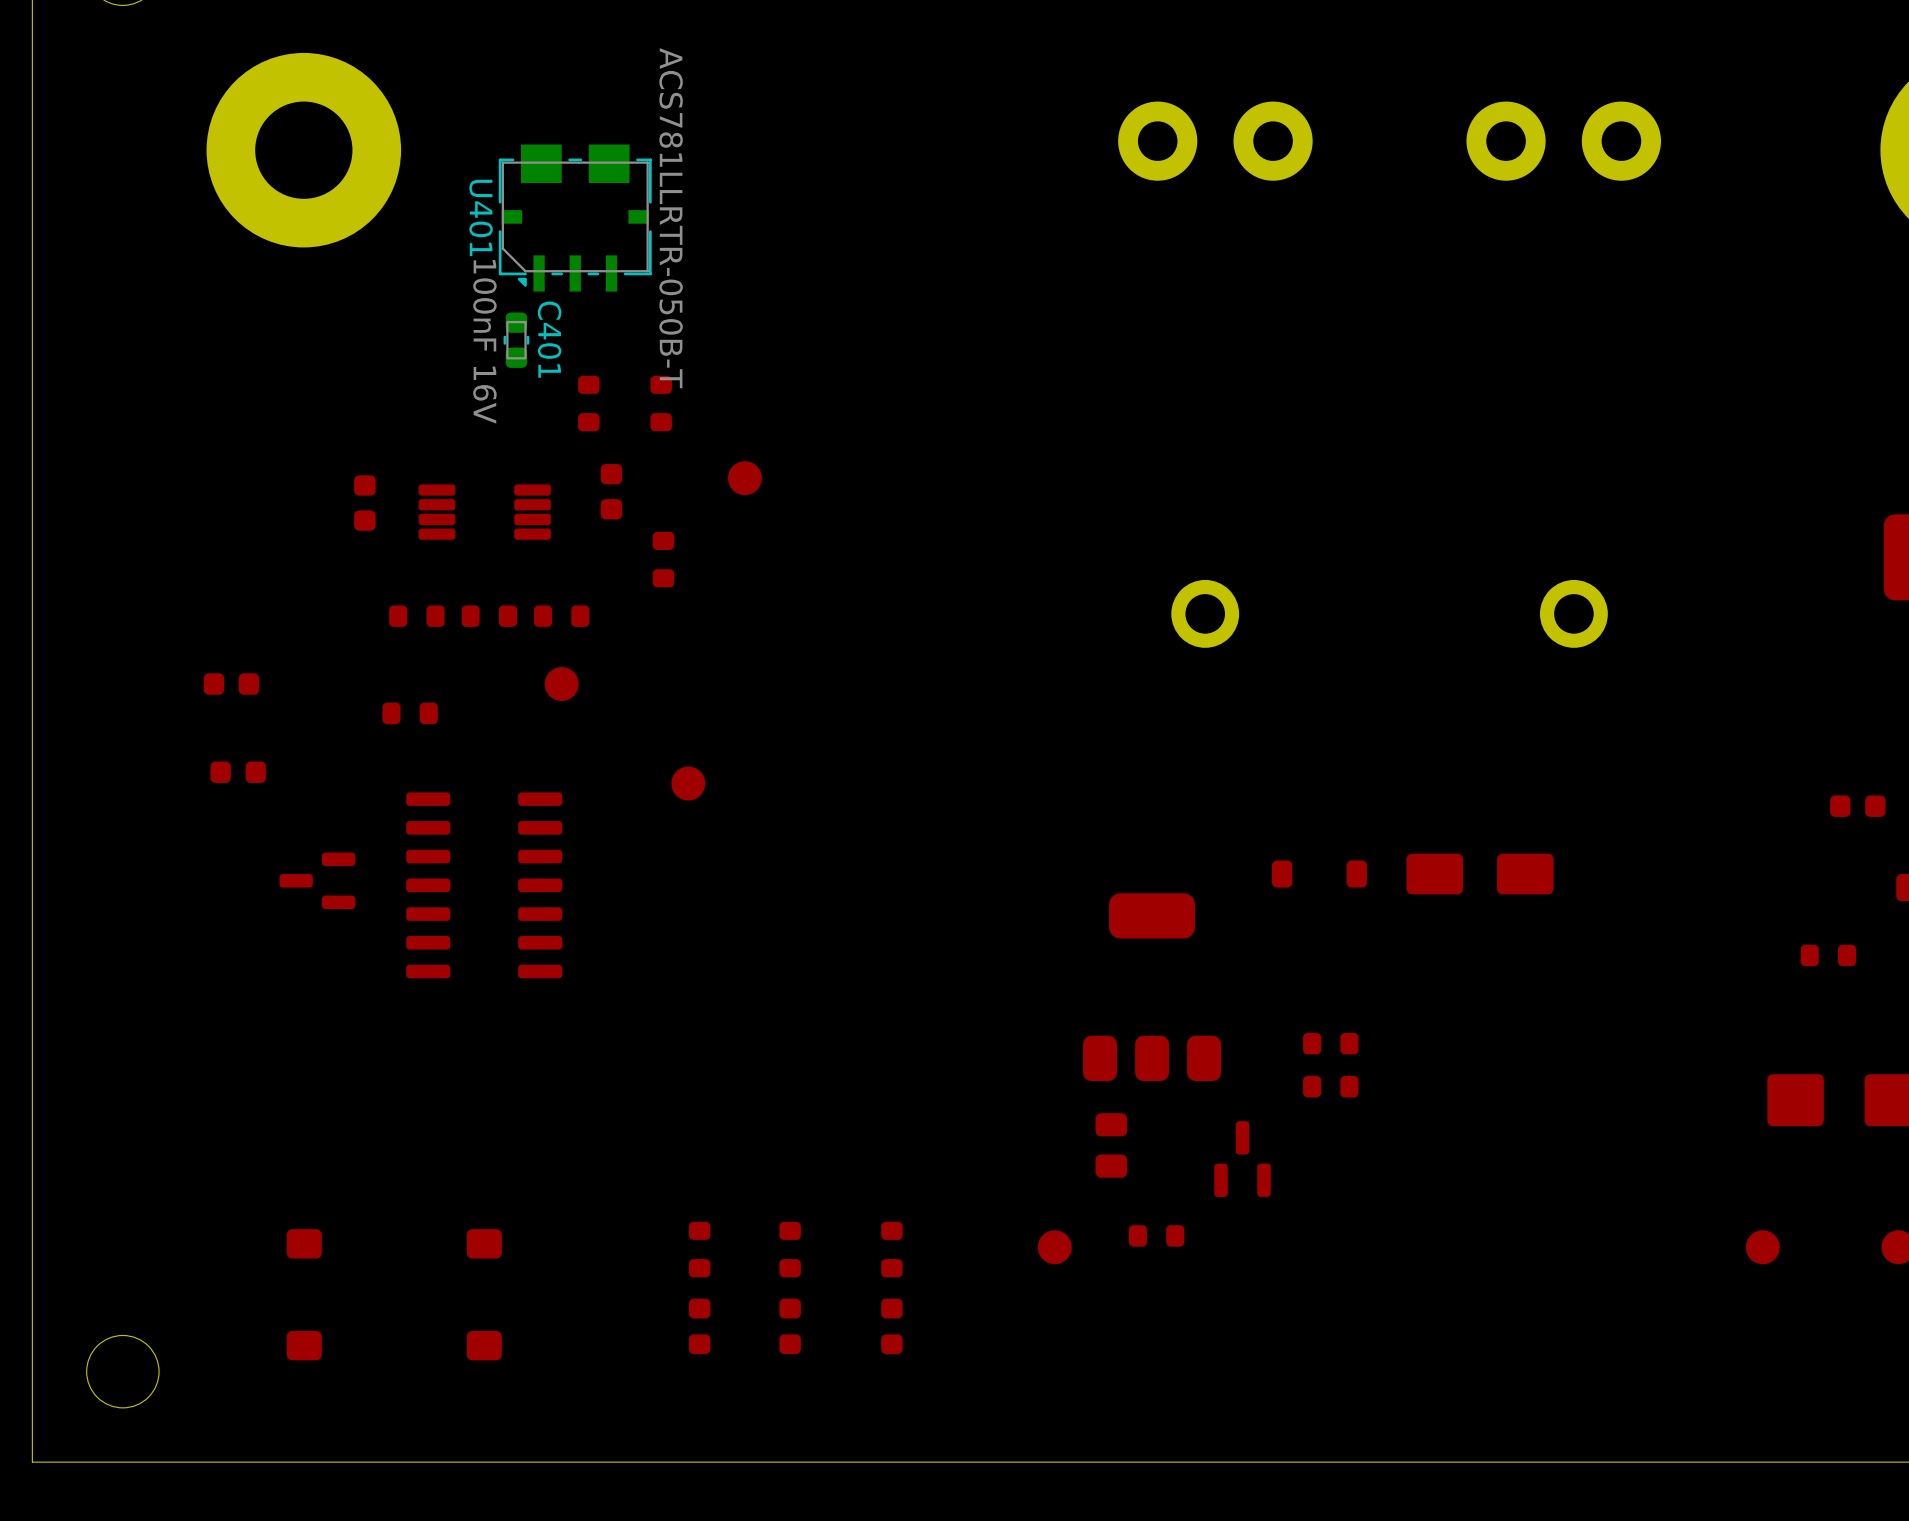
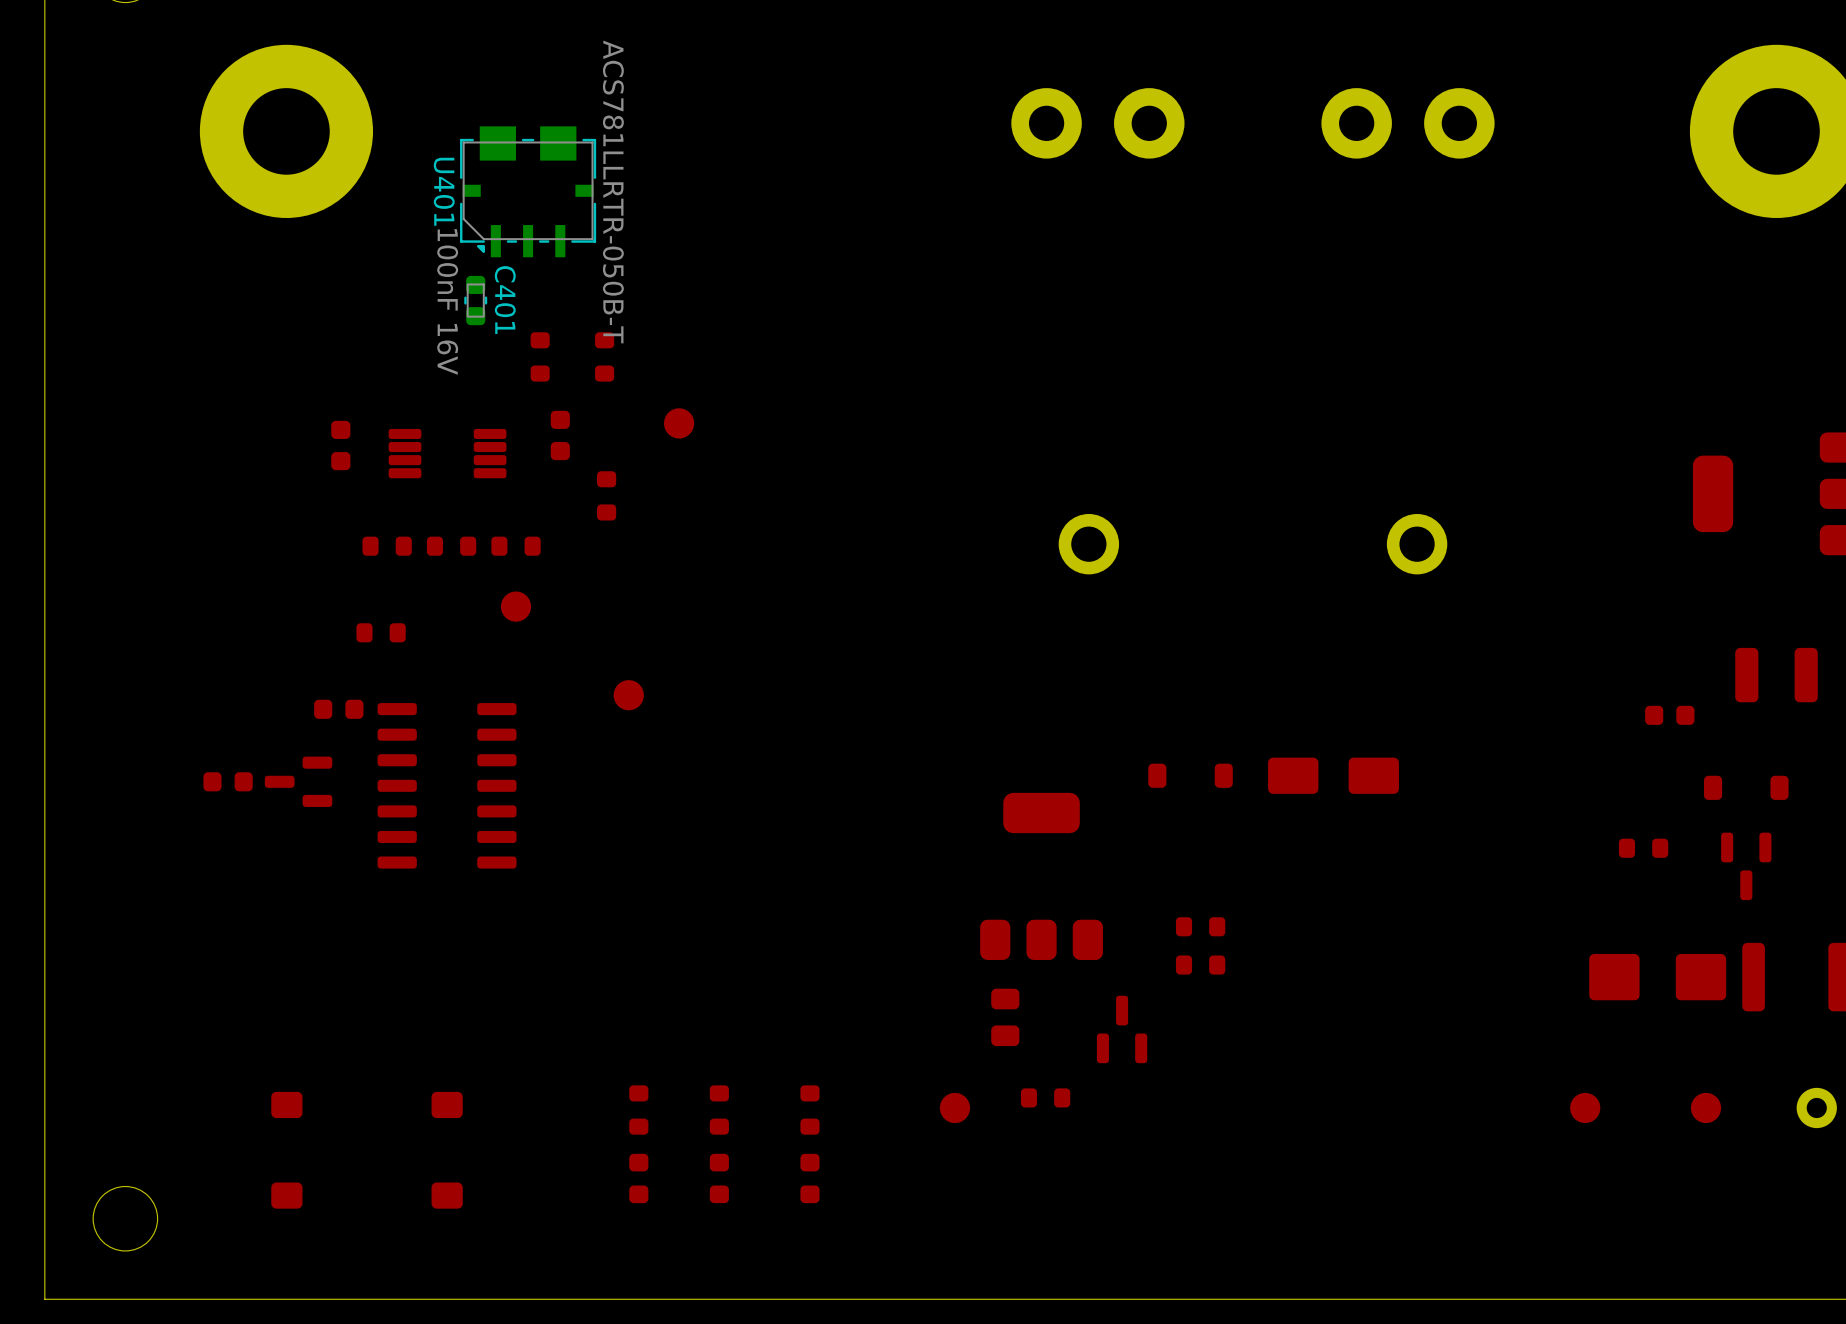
part: (231, 684) -> none
part: (238, 772) -> none
part: none -> (338, 709)
part: none -> (228, 781)

